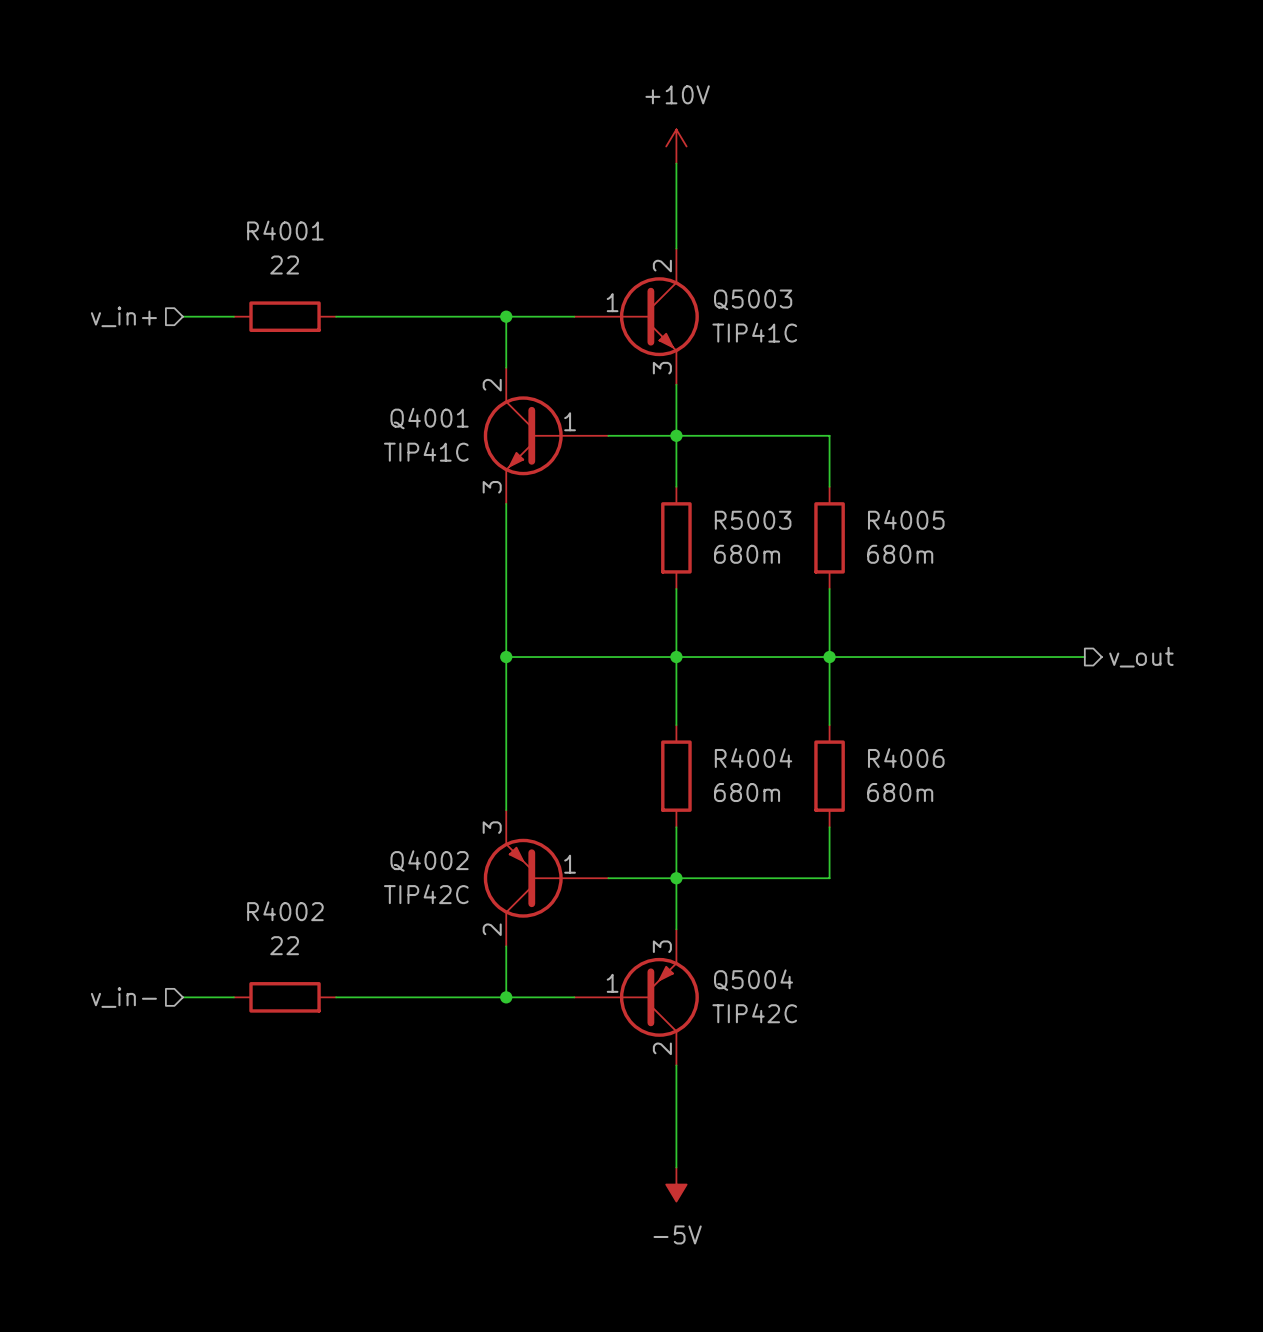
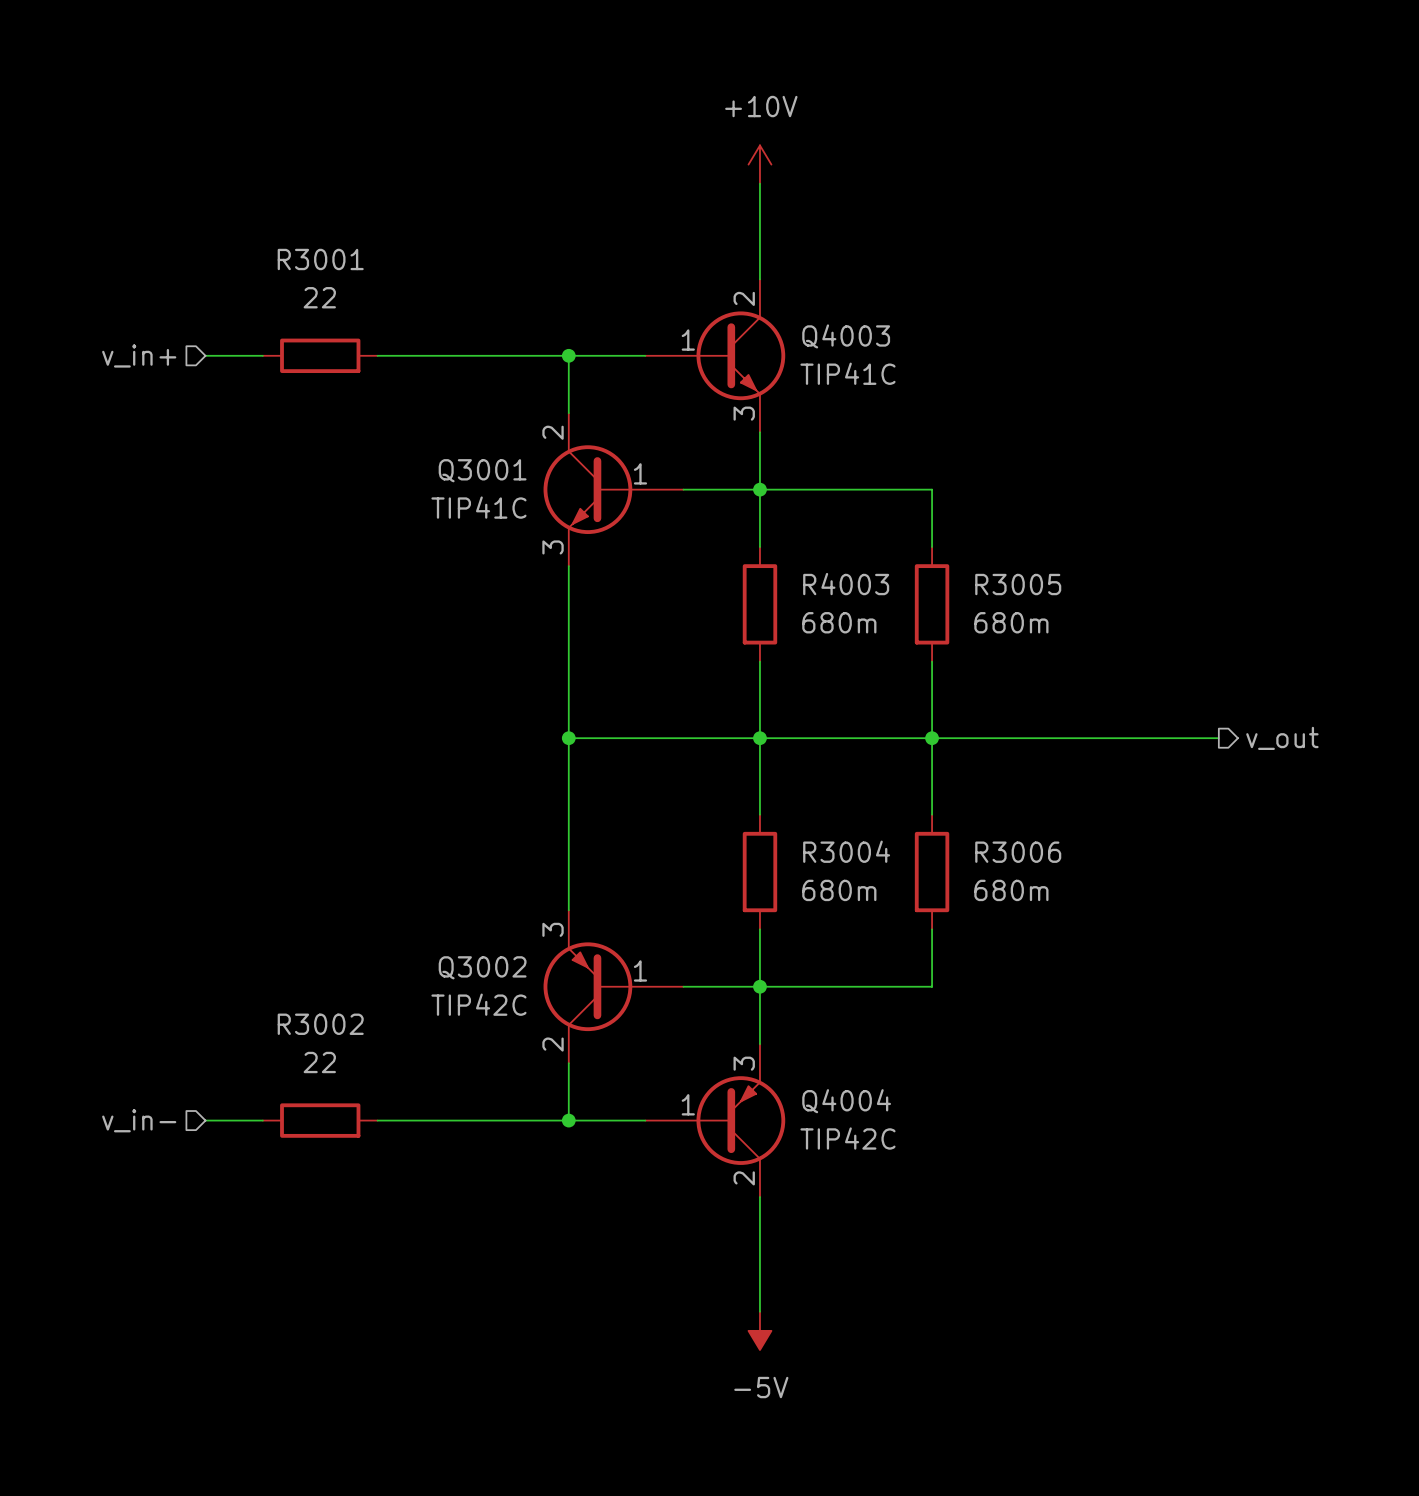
R4001 name: R4001 (285, 230) -> R3001 (320, 259)
Q5003 name: Q5003 (753, 299) -> Q4003 (846, 336)
Q4001 name: Q4001 (429, 418) -> Q3001 (482, 470)
R4005 name: R4005 (906, 519) -> R3005 (1018, 584)
R5003 name: R5003 (753, 520) -> R4003 (846, 584)
R4004 name: R4004 (753, 758) -> R3004 (846, 851)
R4006 name: R4006 (906, 758) -> R3006 (1018, 852)
Q4002 name: Q4002 (429, 860) -> Q3002 (482, 967)
R4002 name: R4002 (285, 911) -> R3002 (320, 1024)
Q5004 name: Q5004 (753, 980) -> Q4004 (846, 1101)

